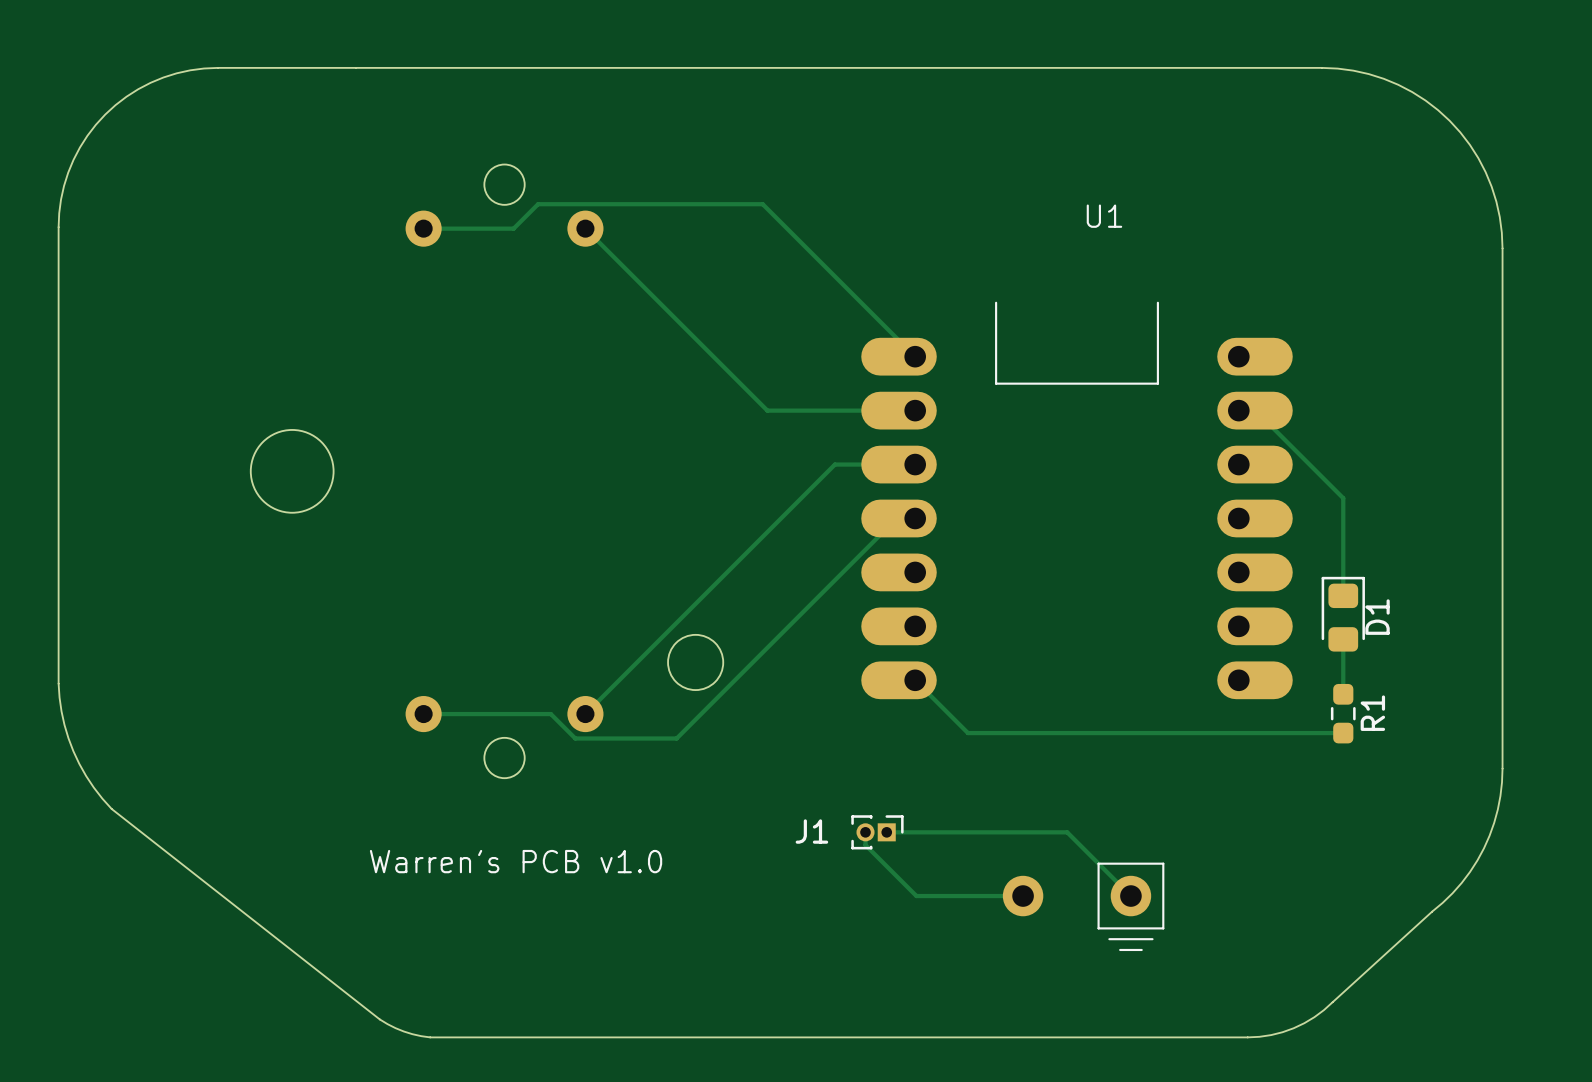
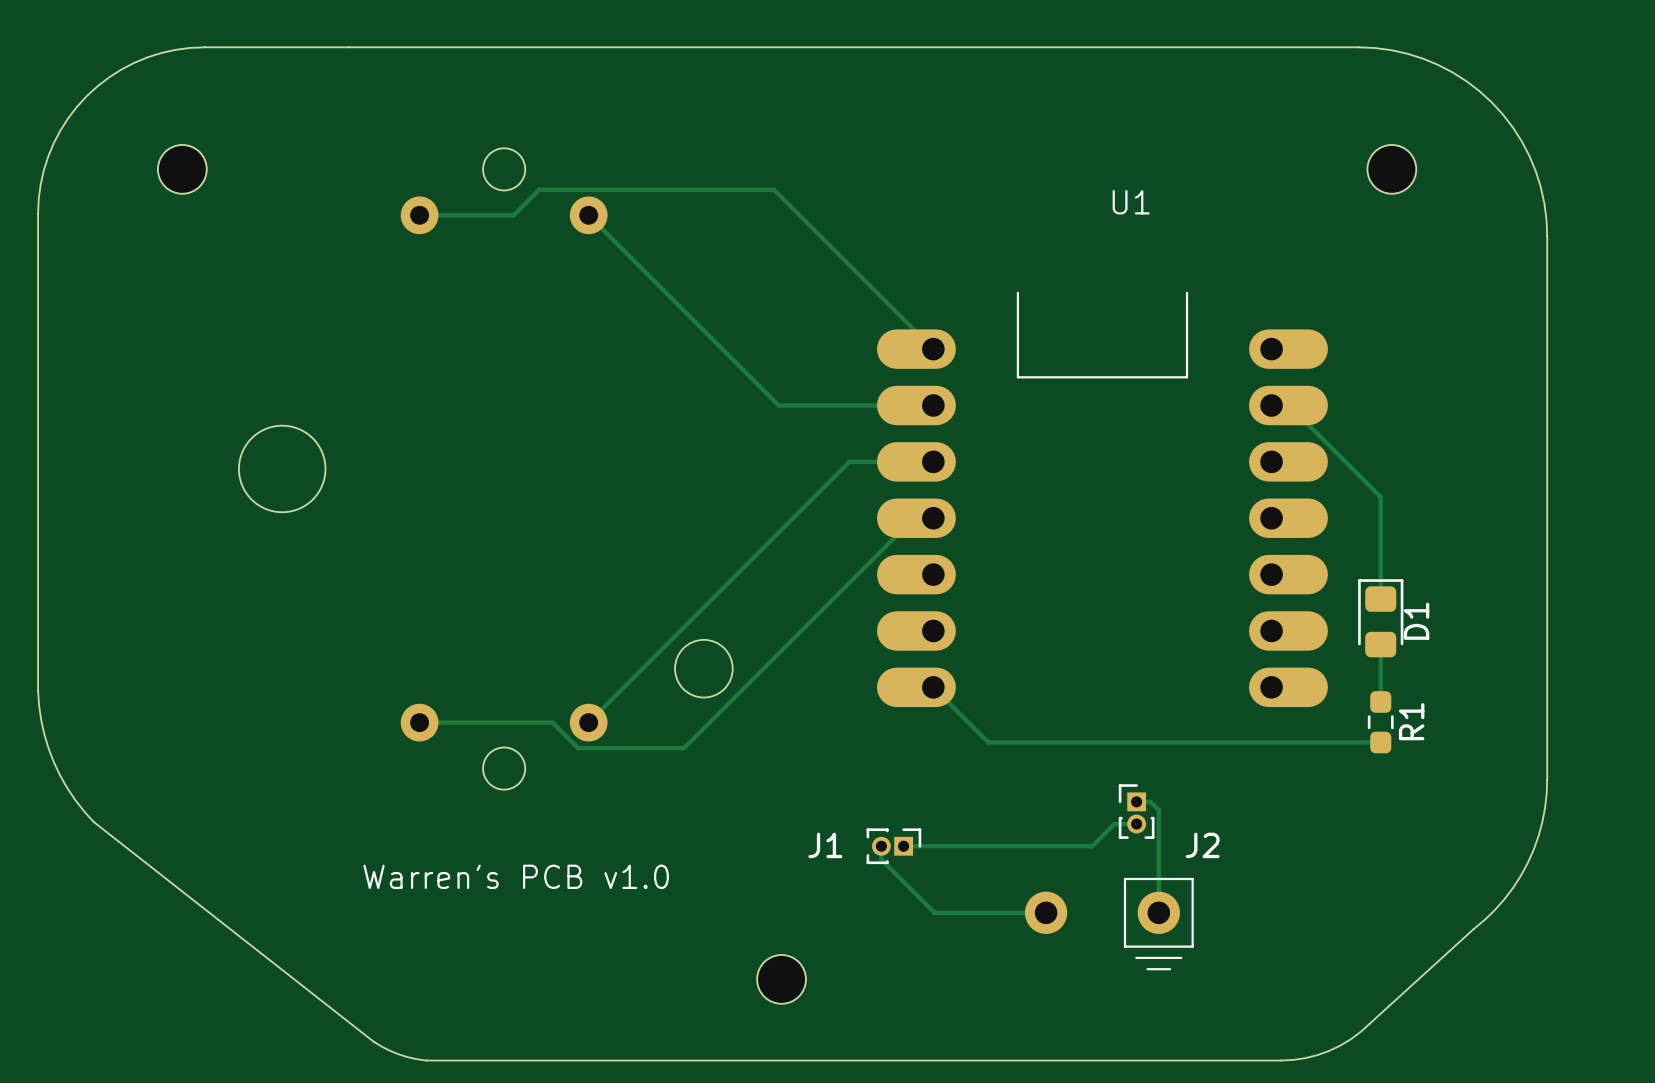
part: none -> (182, 169)
part: none -> (1391, 169)
J2: none -> (1136, 811)
track: none -> (1136, 824) (1114, 824) (1092, 846)
track: (1067, 832) (1130, 896) -> (1136, 801) (1150, 801) (1158, 810) (1158, 912)
part: none -> (781, 979)

